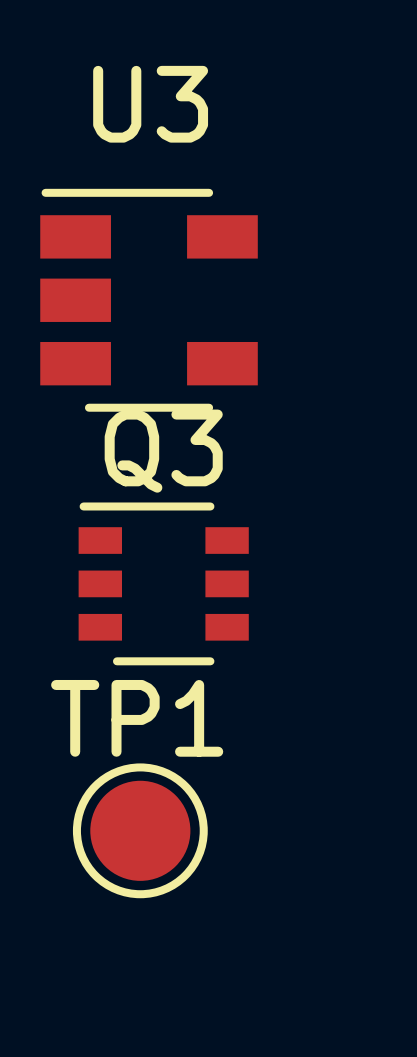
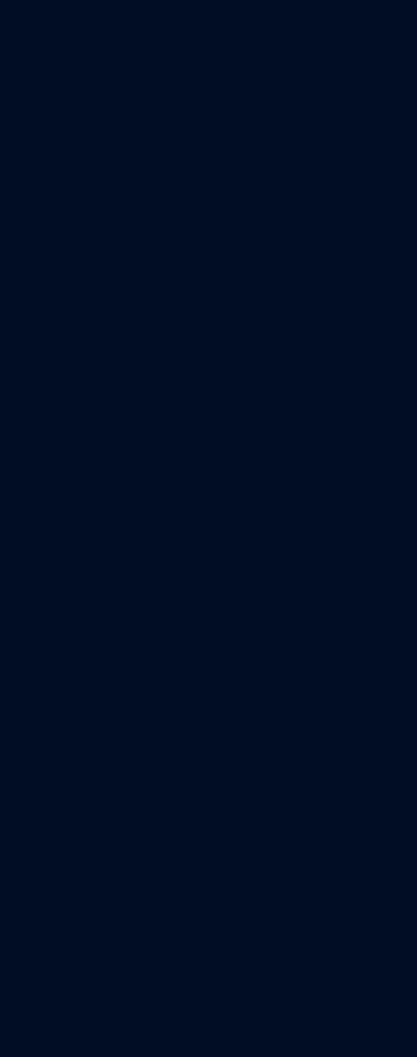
U3: (149, 300) -> none
Q3: (163, 583) -> none
TP1: (140, 830) -> none

